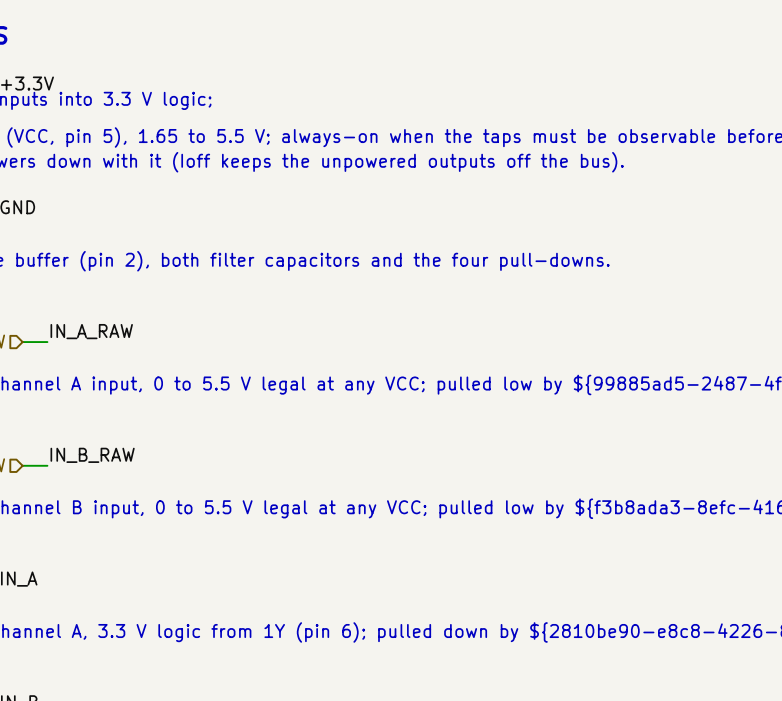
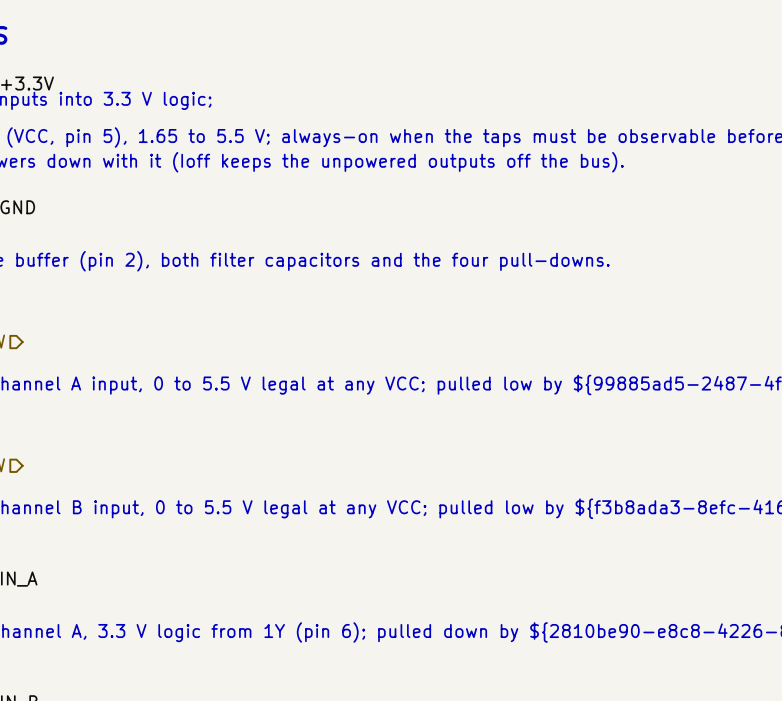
label: IN_A_RAW (91, 331) -> none
wire: (22, 342) (47, 342) -> none
label: IN_B_RAW (92, 455) -> none
wire: (22, 465) (47, 465) -> none

